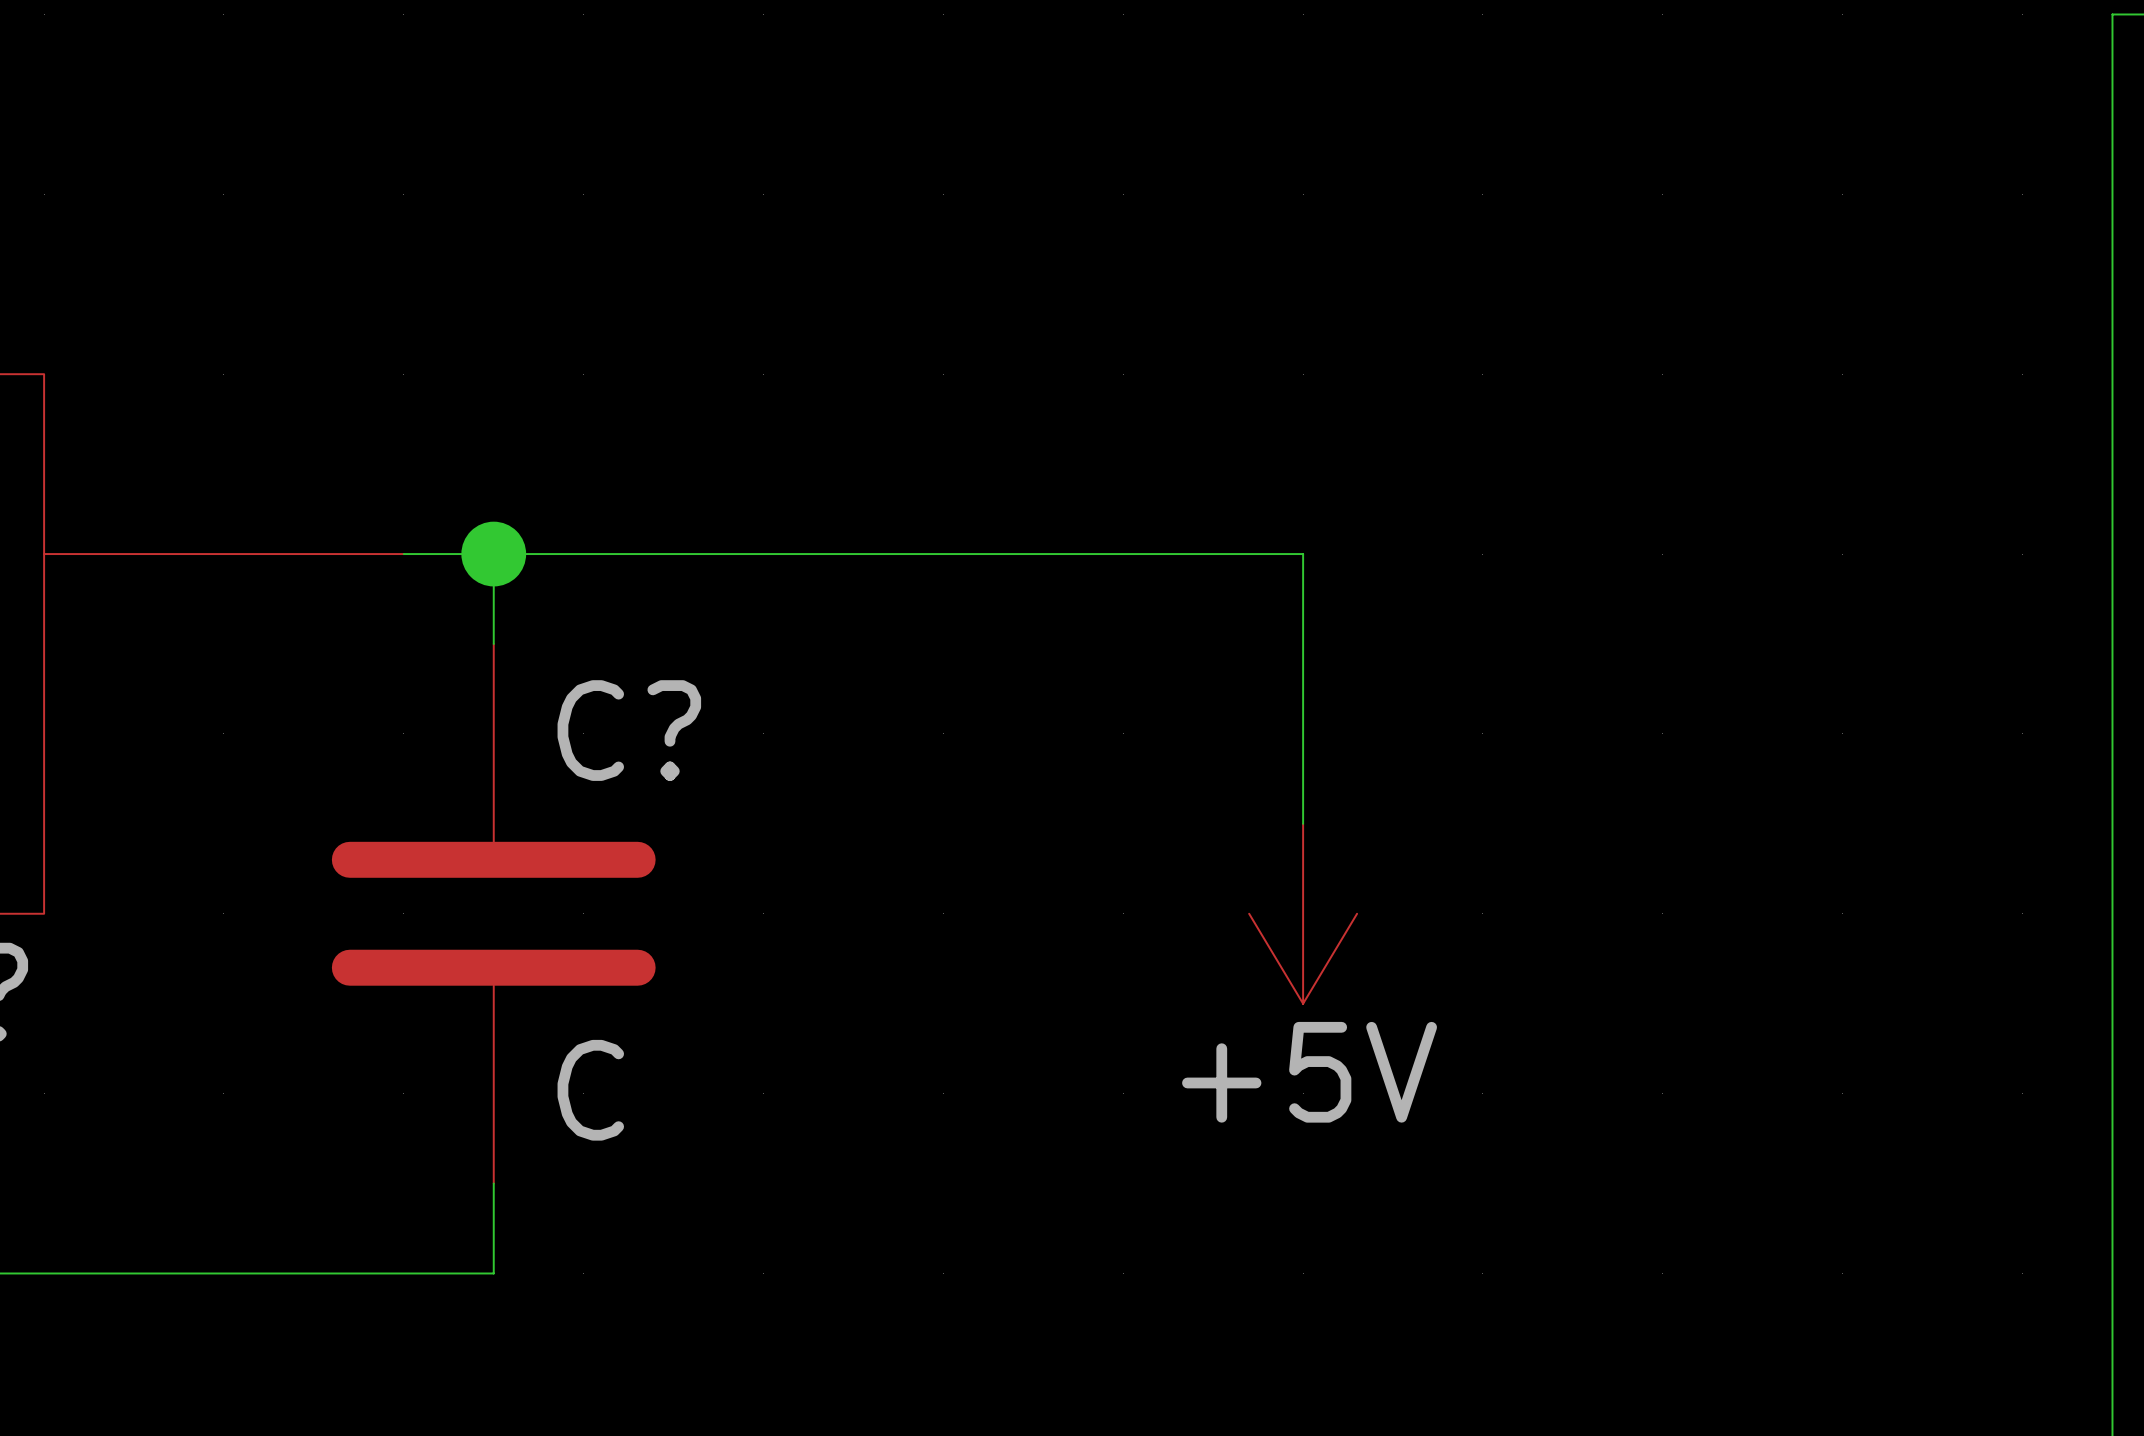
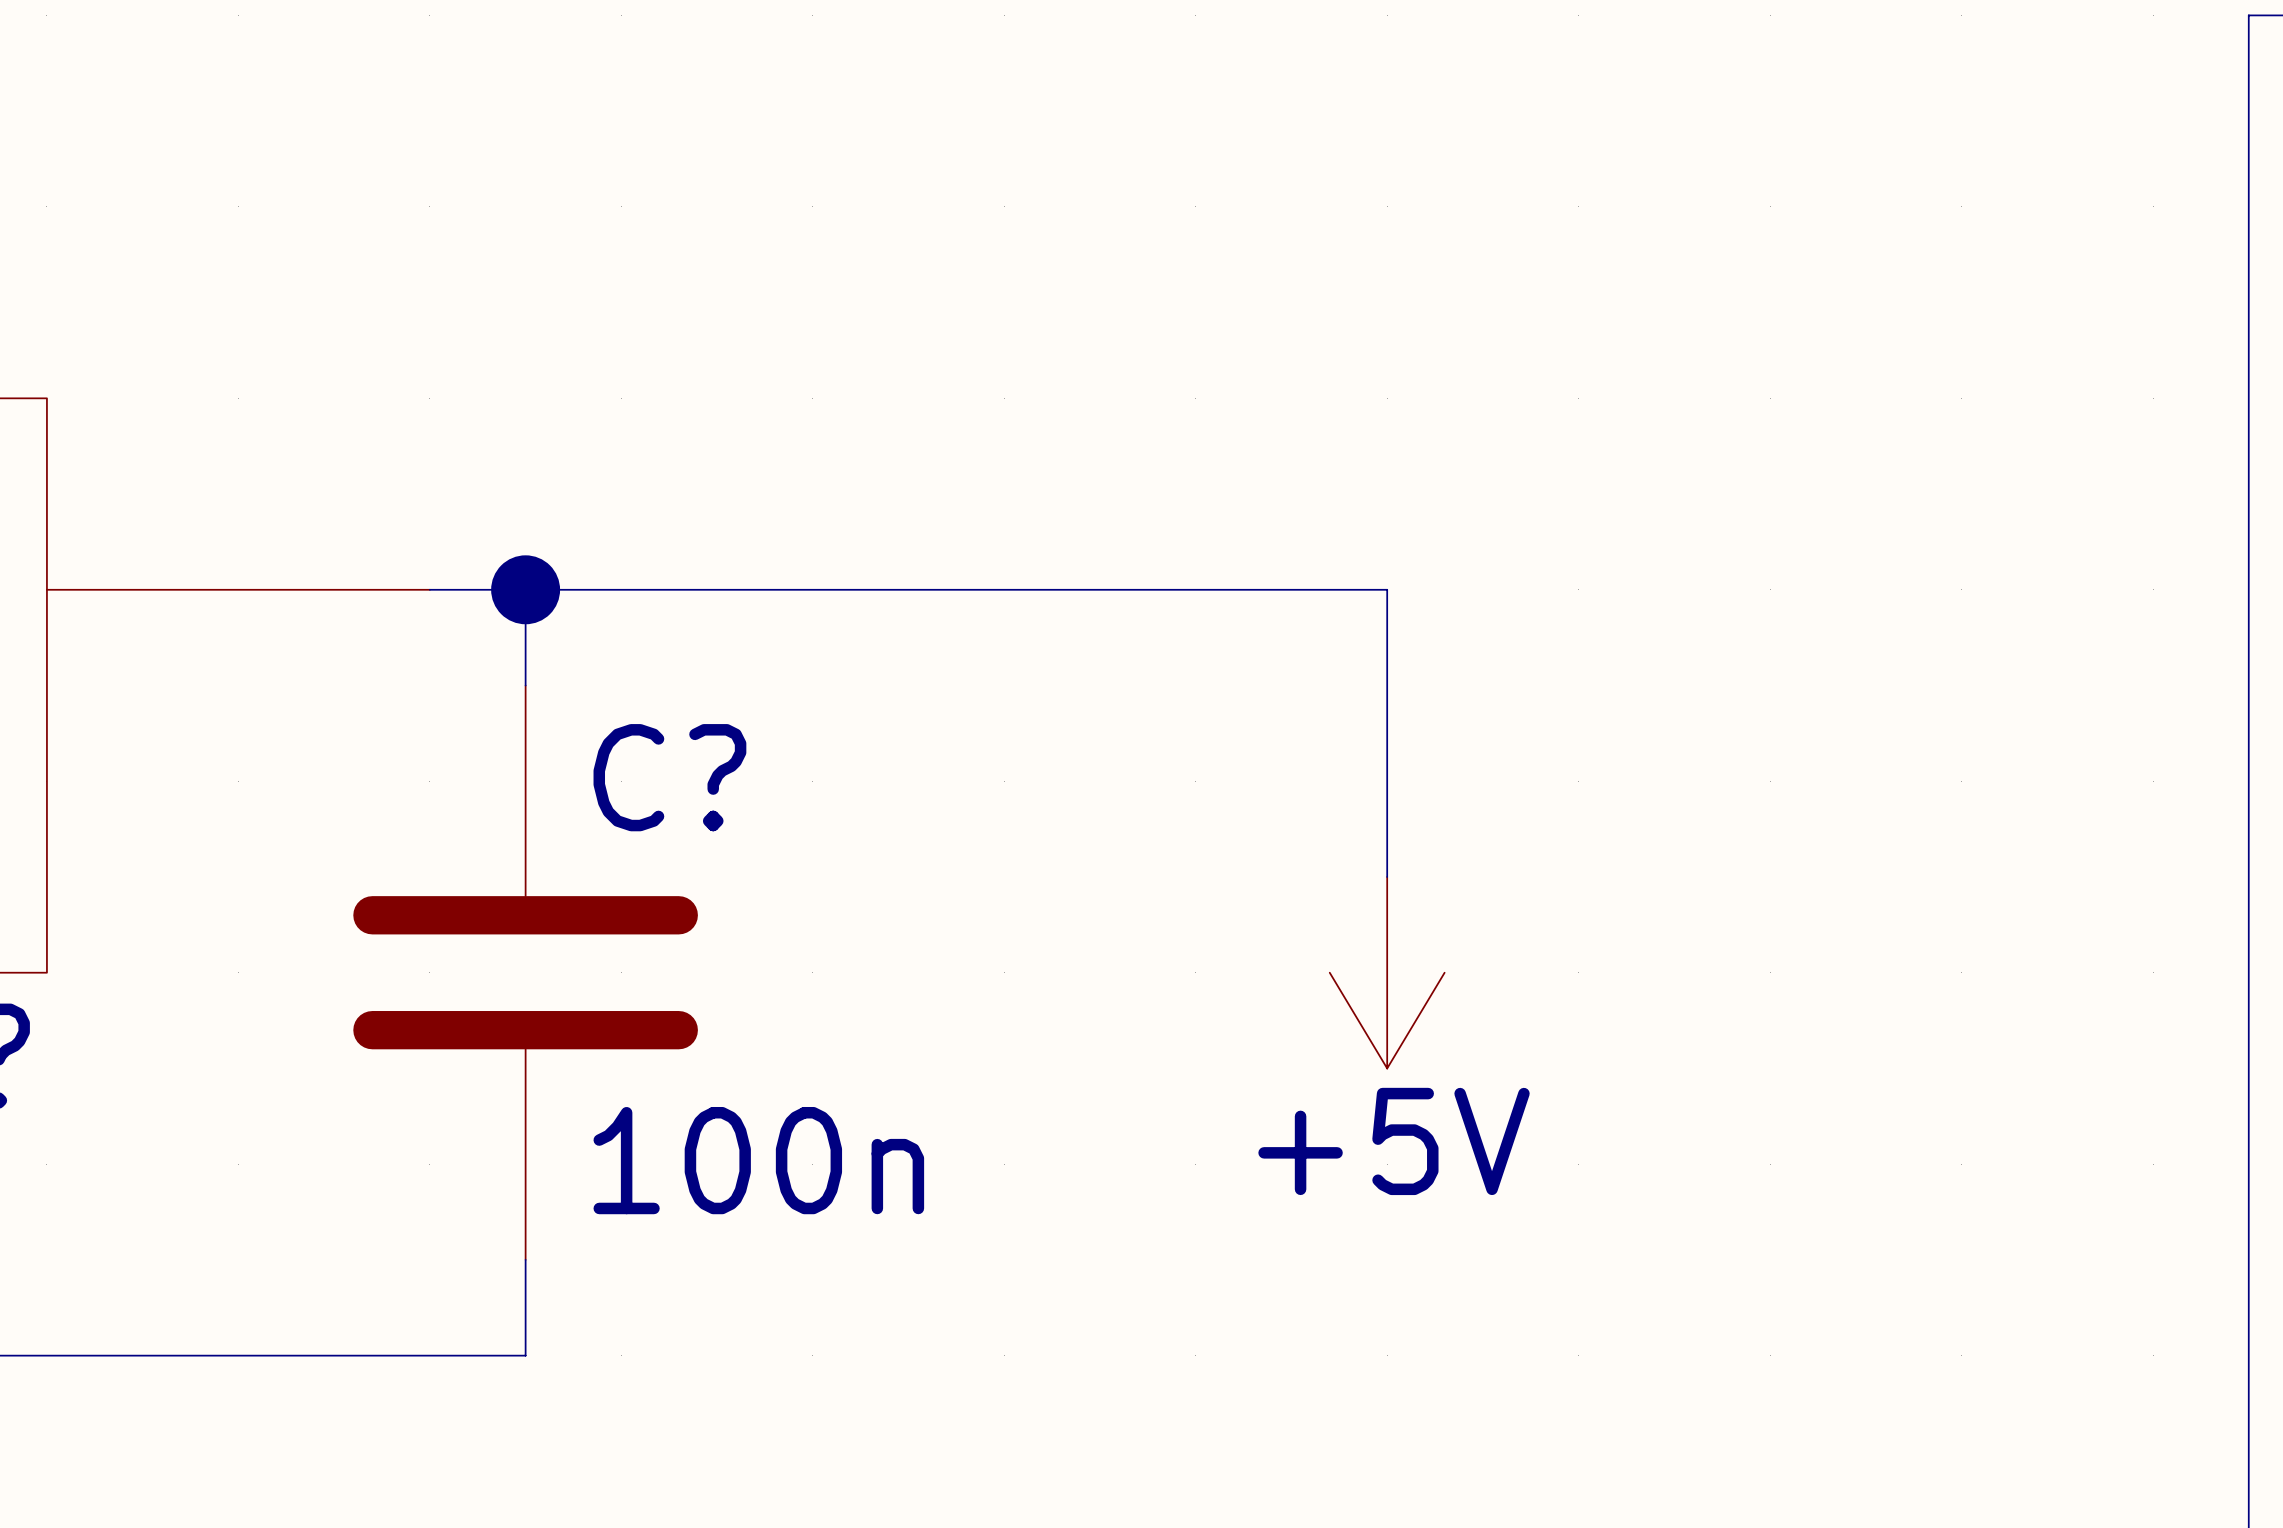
C? value: C (590, 1090) -> 100n (758, 1160)

